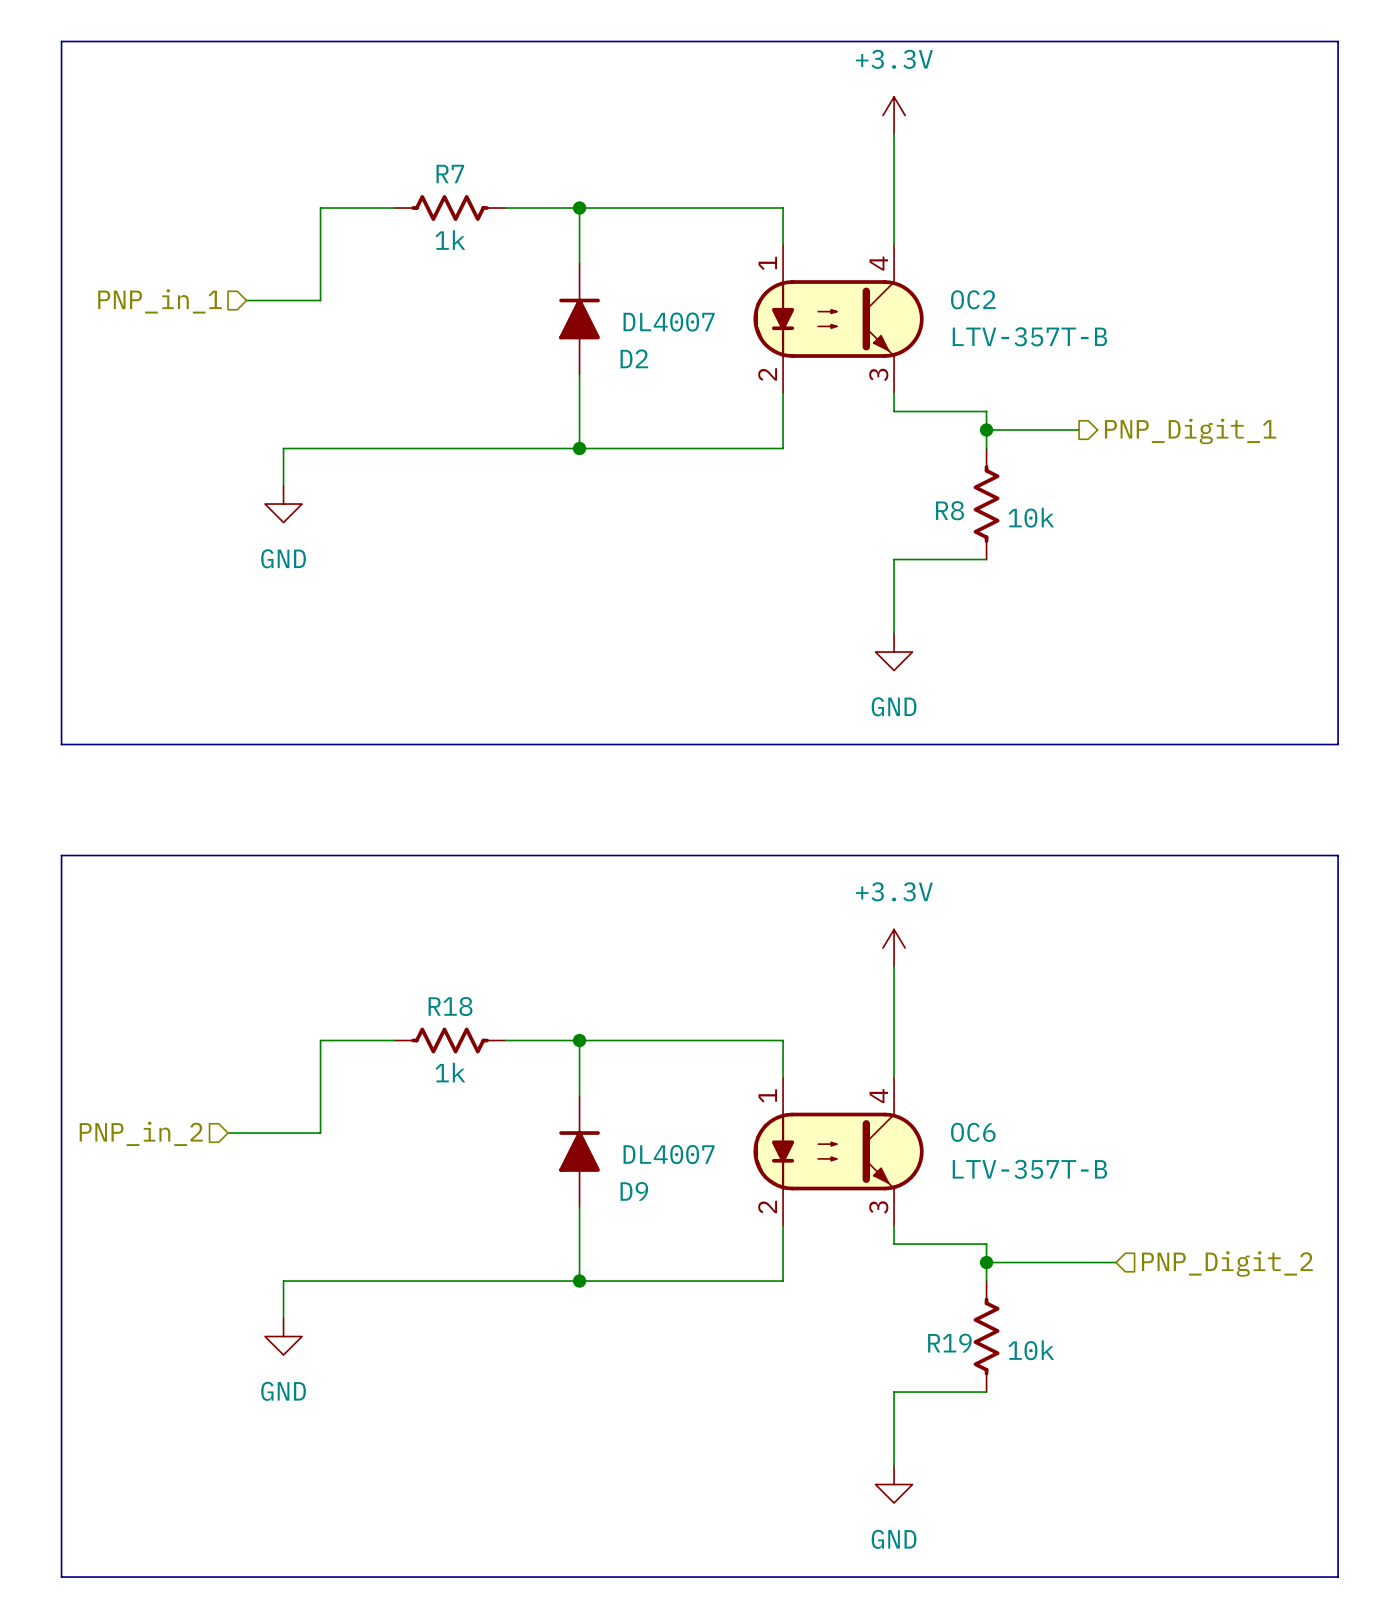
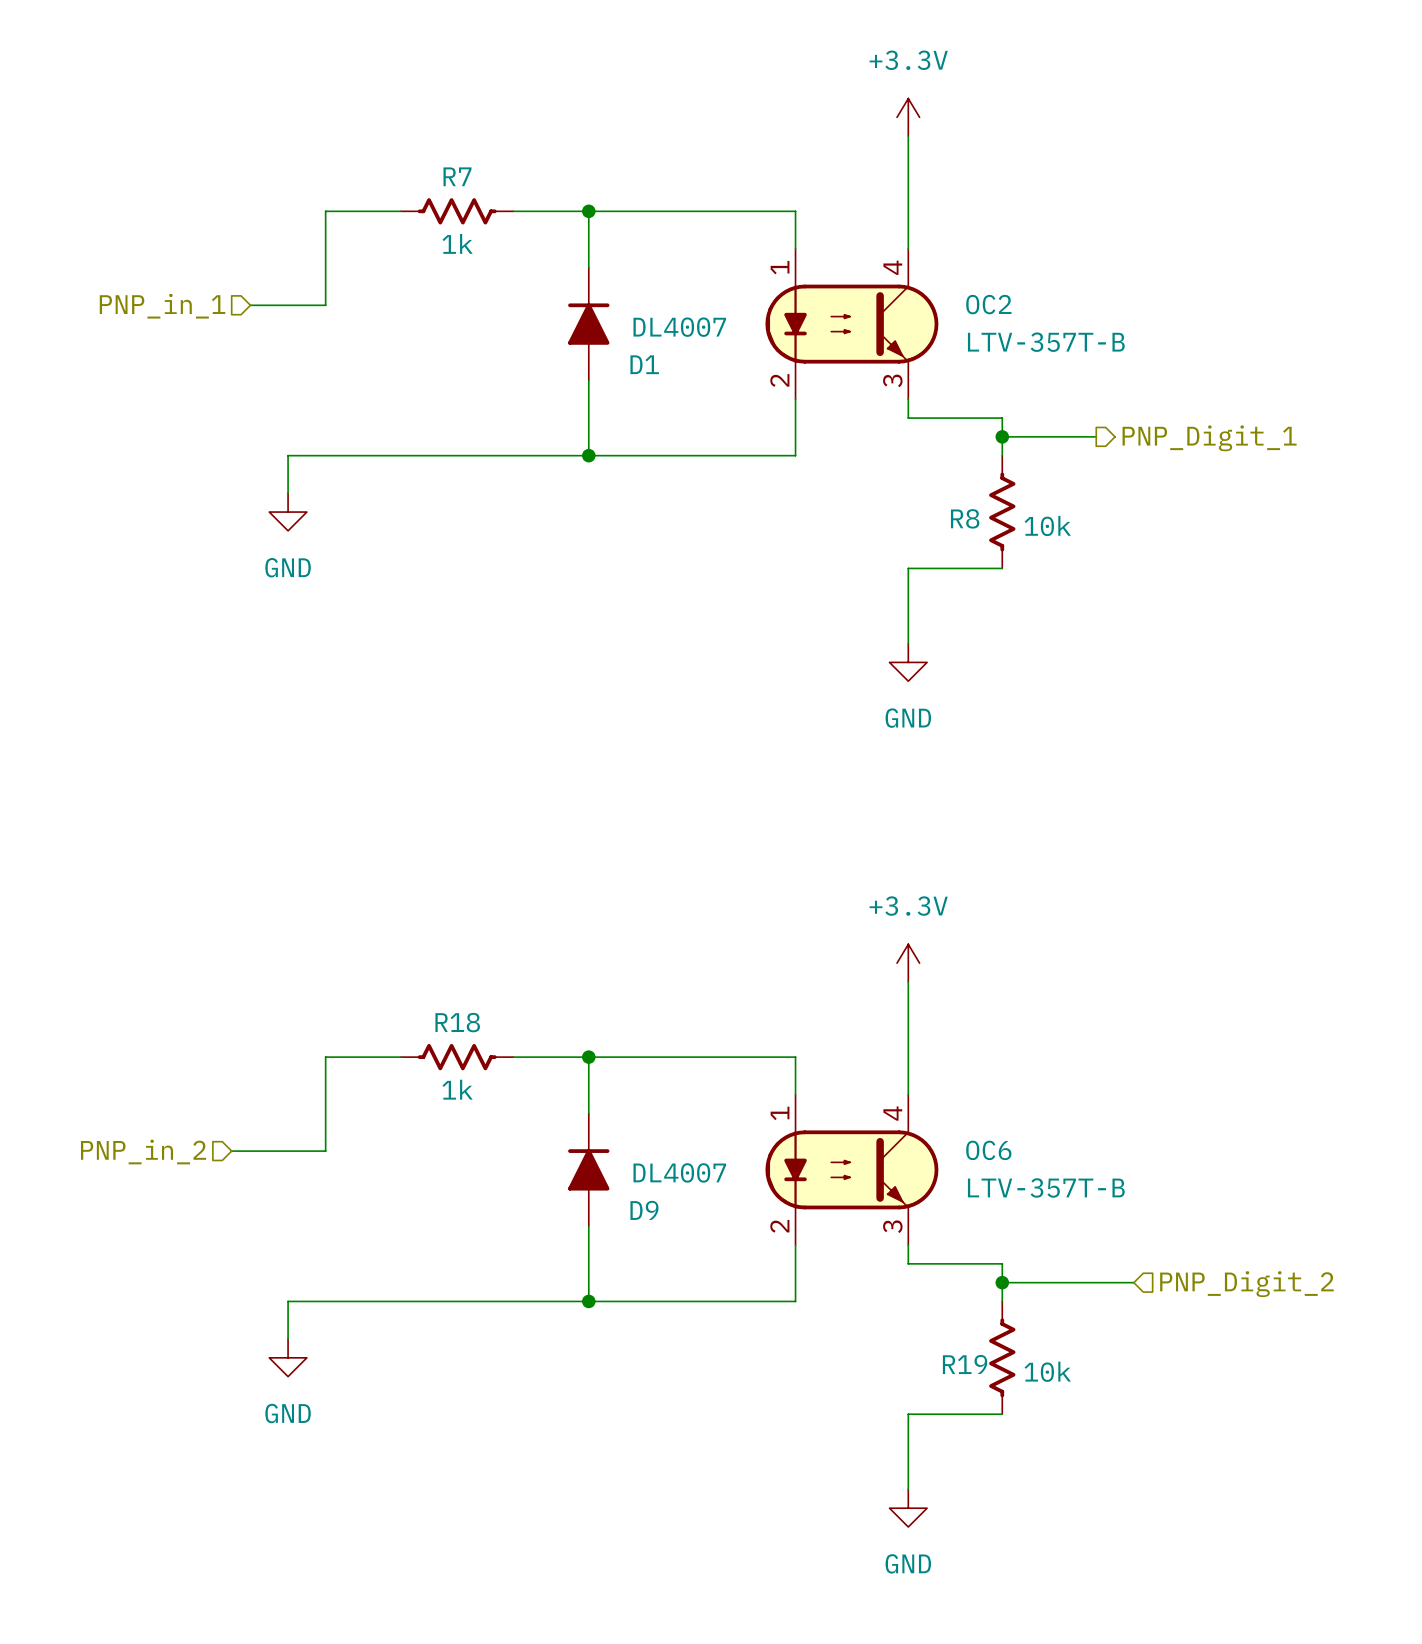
line: (61, 41) (1338, 41) (1338, 744) (61, 744) (61, 41) -> none
D2 name: D2 (634, 358) -> D1 (644, 364)
line: (61, 855) (61, 1577) (1338, 1577) (1338, 855) (61, 855) -> none

